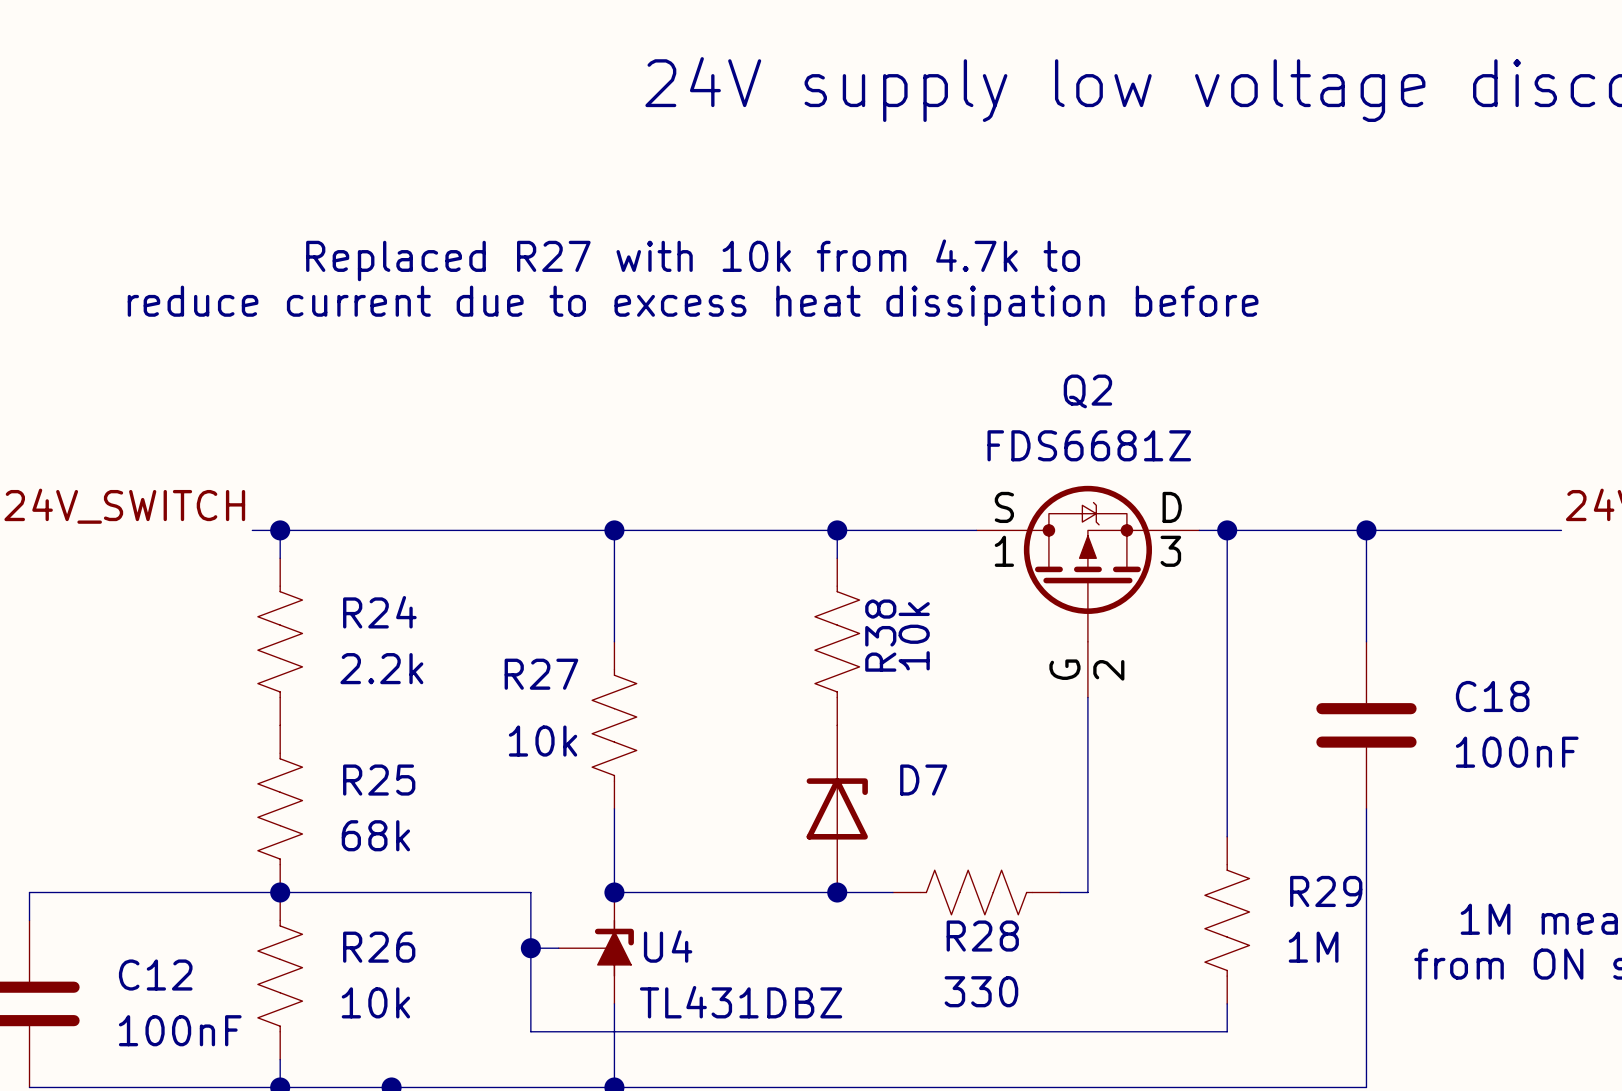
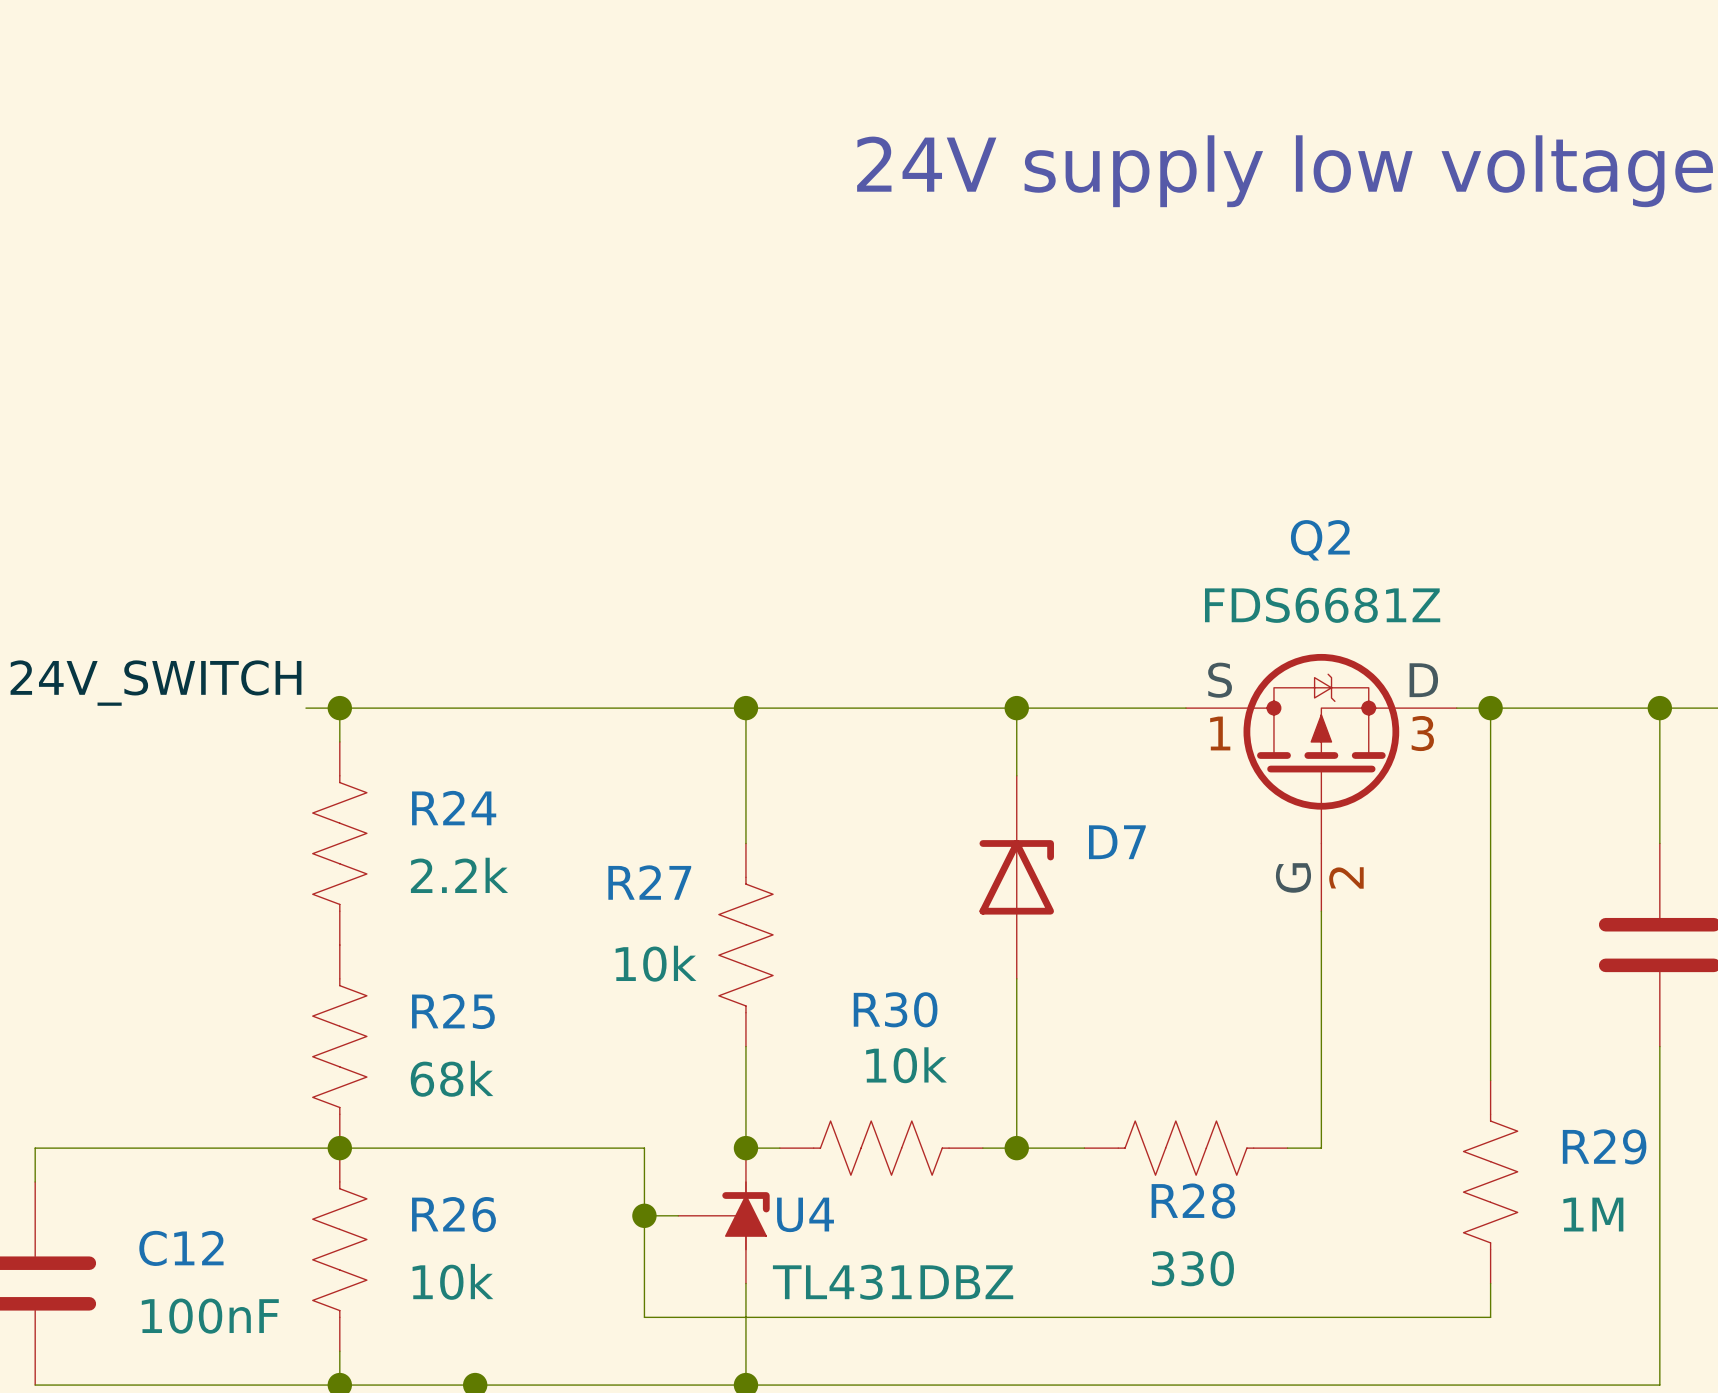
text: Replaced R27 with 10k from 4.7k to (693, 260) -> none
text: reduce current due to excess heat dissipation before (693, 305) -> none
R38: 10k (837, 641) -> none
D7 position: (837, 808) -> (1016, 877)
wire: (642, 892) (809, 892) -> none
R30: none -> 10k (881, 1148)

